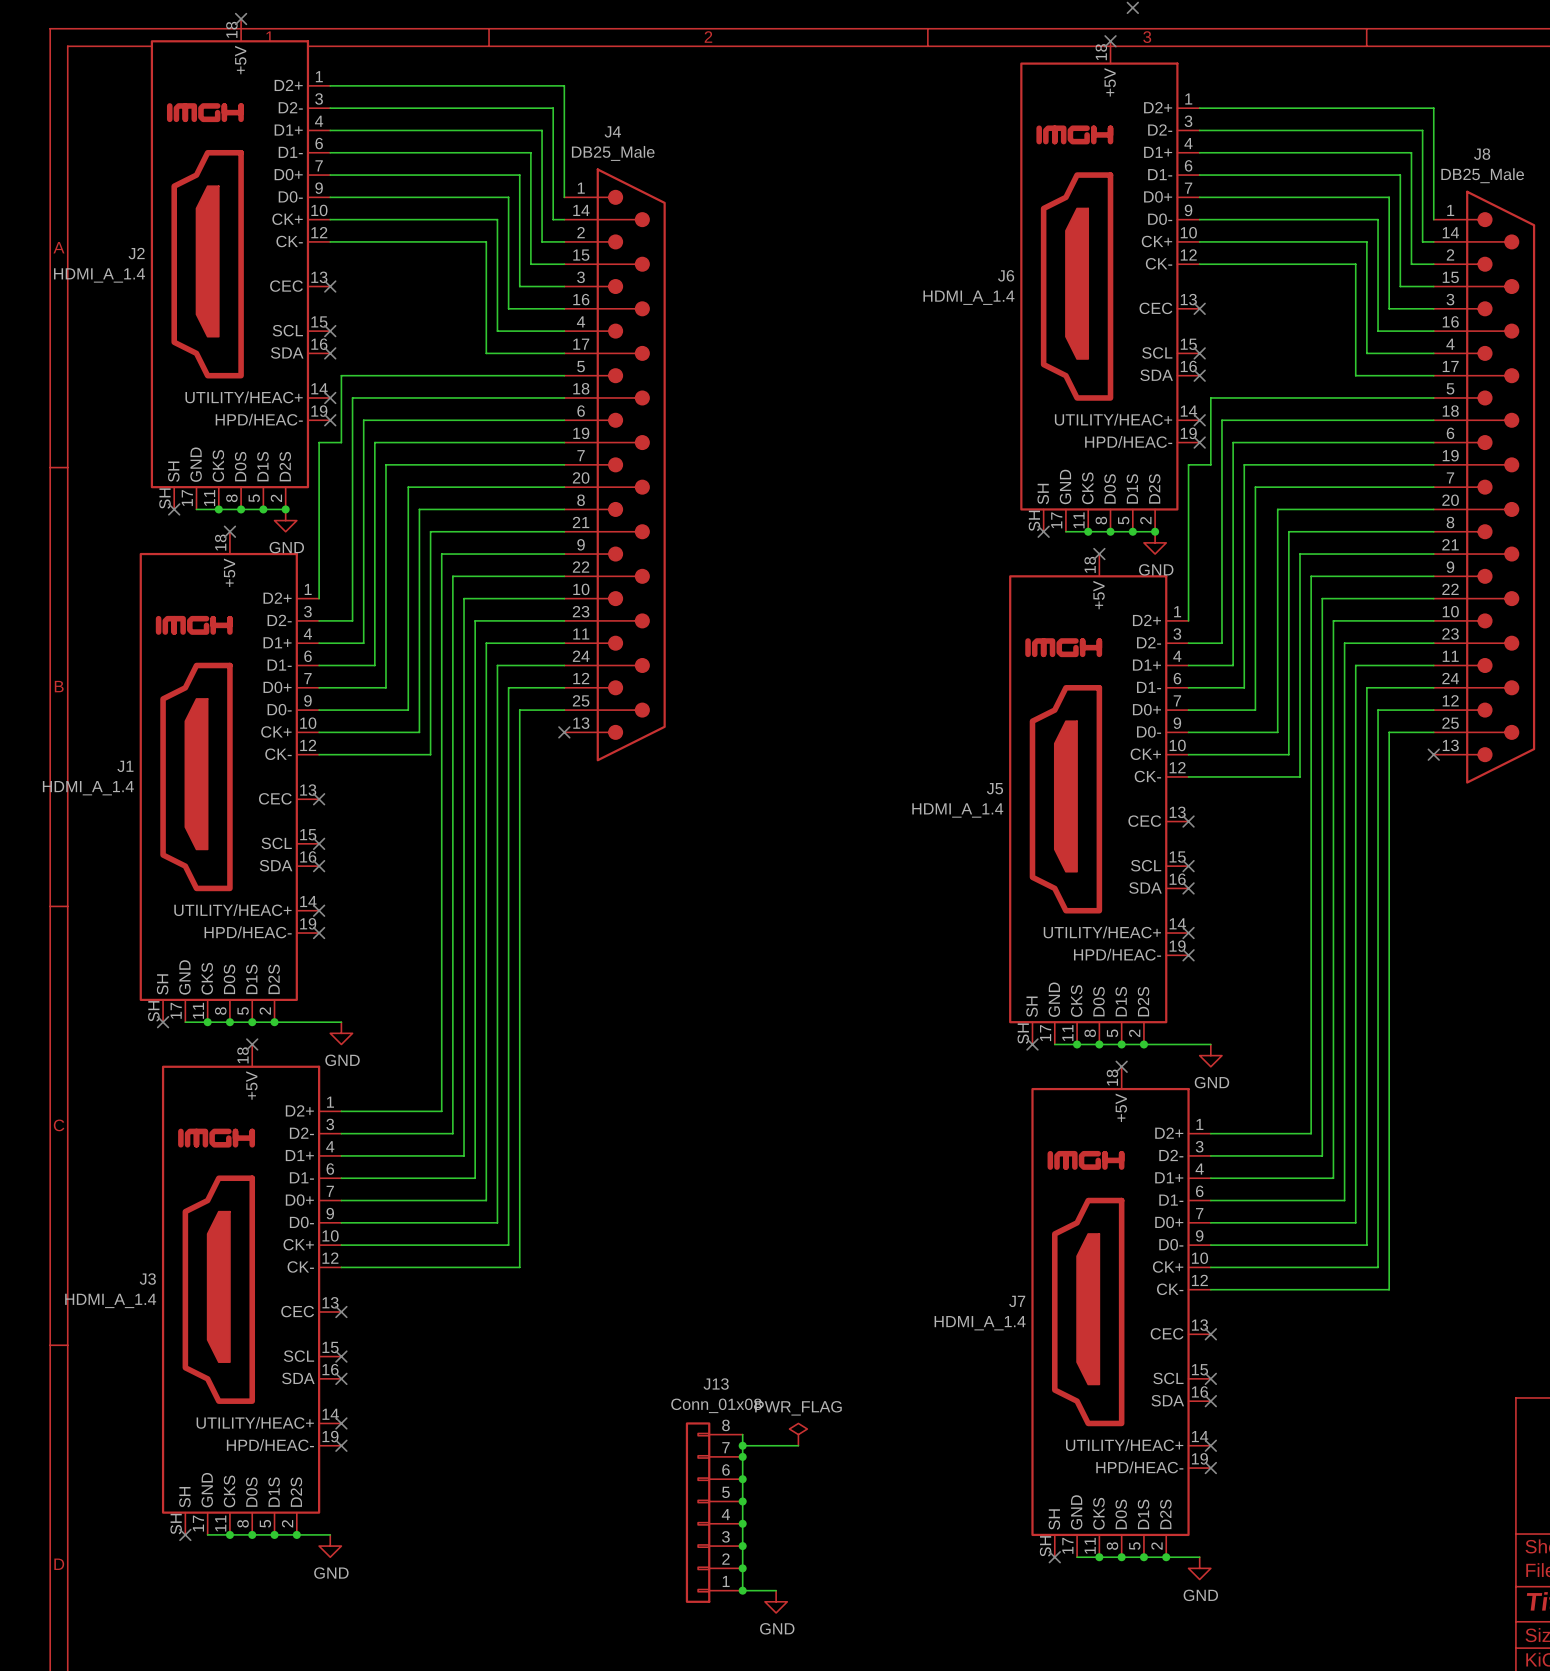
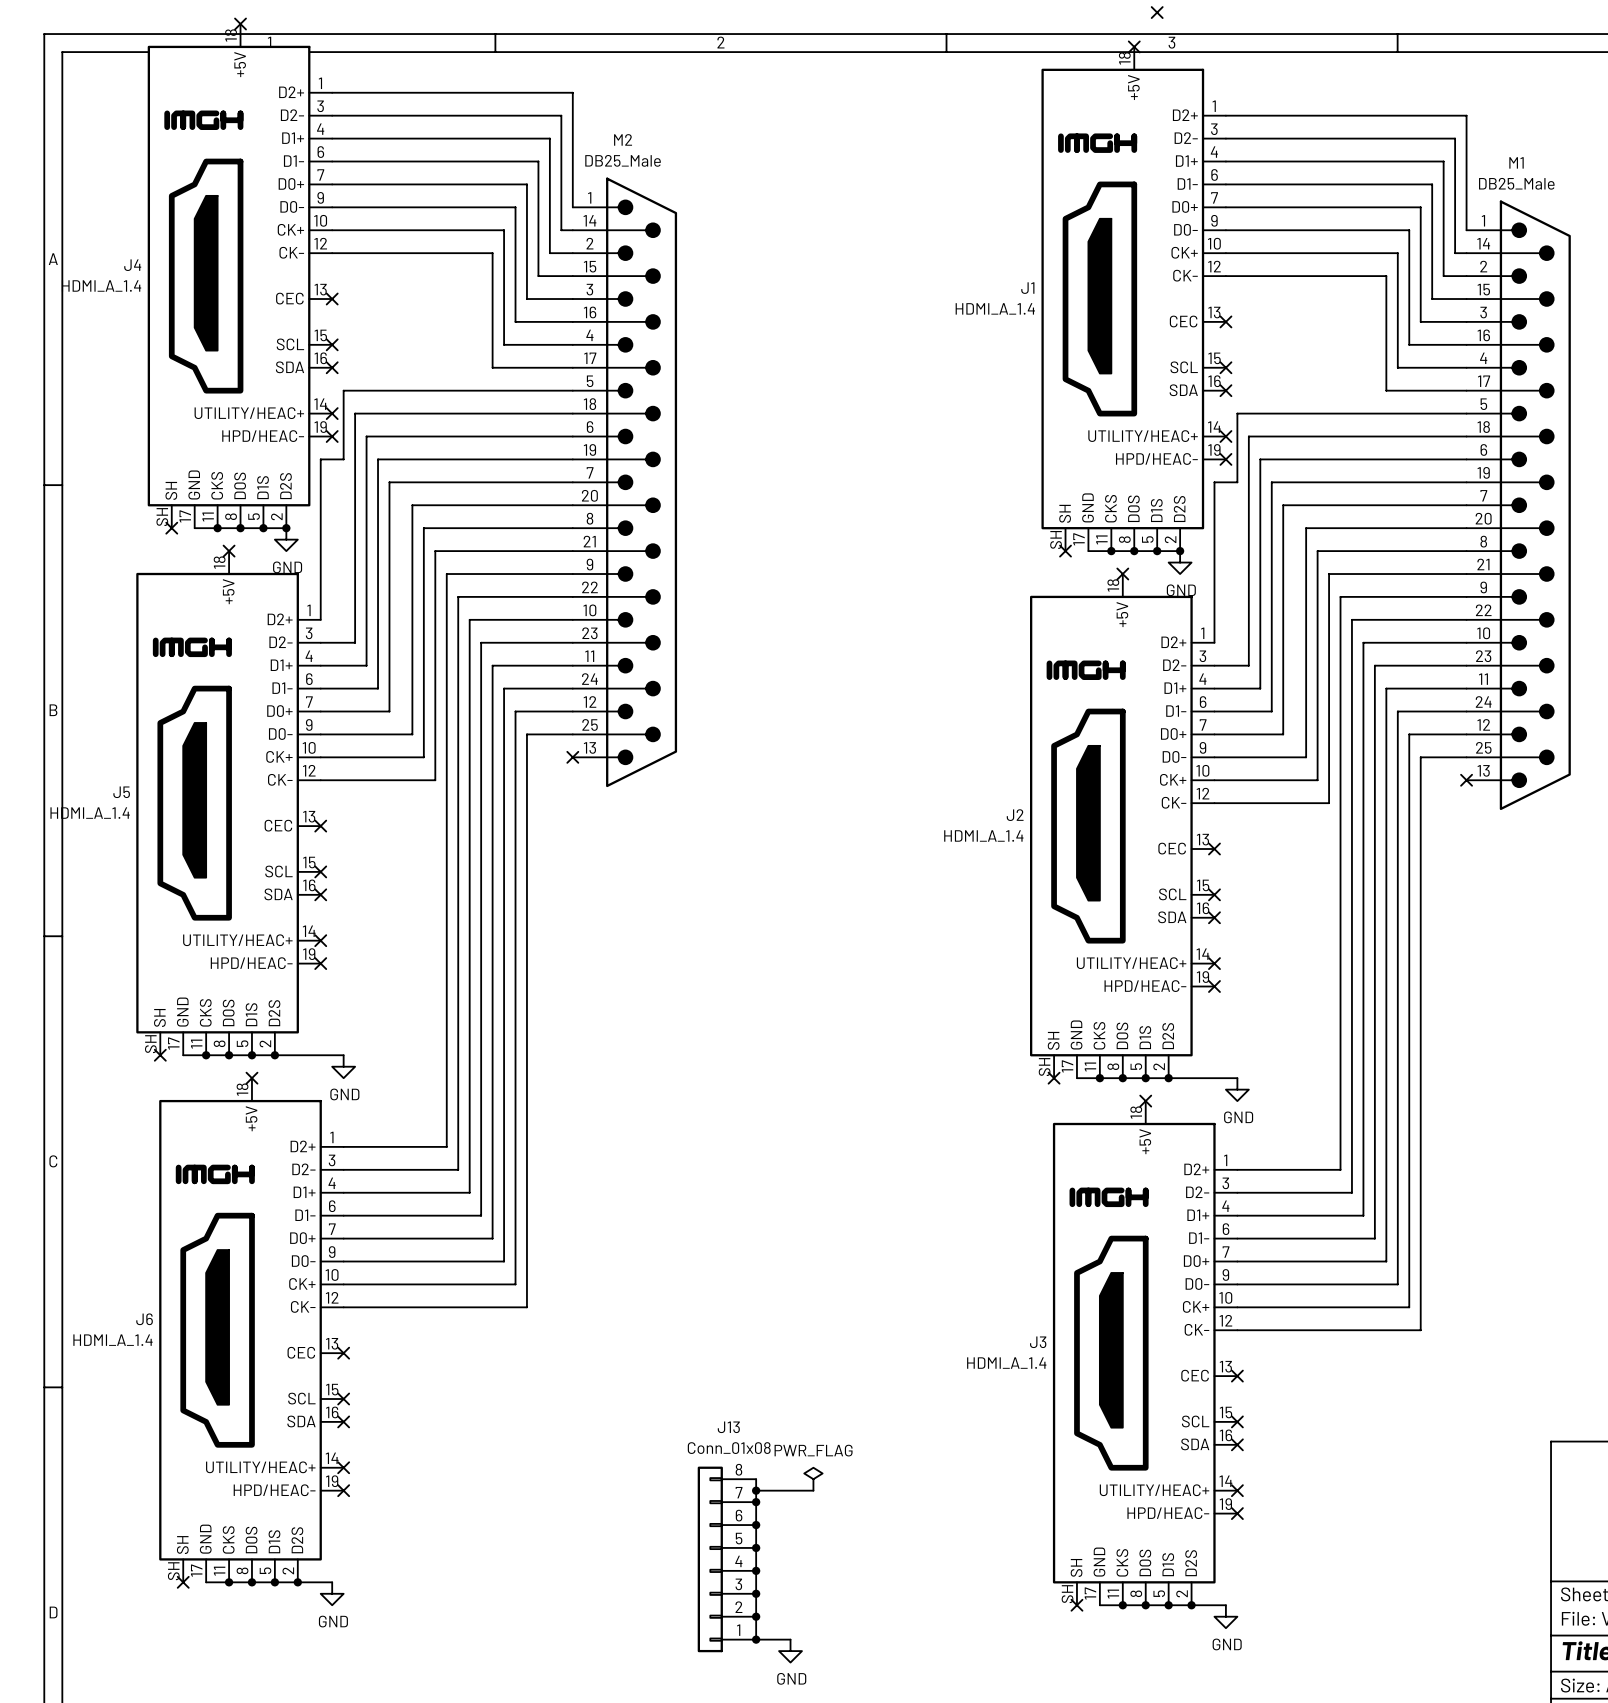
J4 name: J4 (612, 131) -> M2 (623, 139)
J8 name: J8 (1482, 154) -> M1 (1516, 162)
J2 name: J2 (136, 253) -> J4 (132, 265)
J6 name: J6 (1006, 275) -> J1 (1027, 288)
J1 name: J1 (125, 766) -> J5 (121, 792)
J5 name: J5 (994, 788) -> J2 (1015, 815)
J3 name: J3 (147, 1279) -> J6 (144, 1319)
J7 name: J7 (1017, 1301) -> J3 (1038, 1342)

